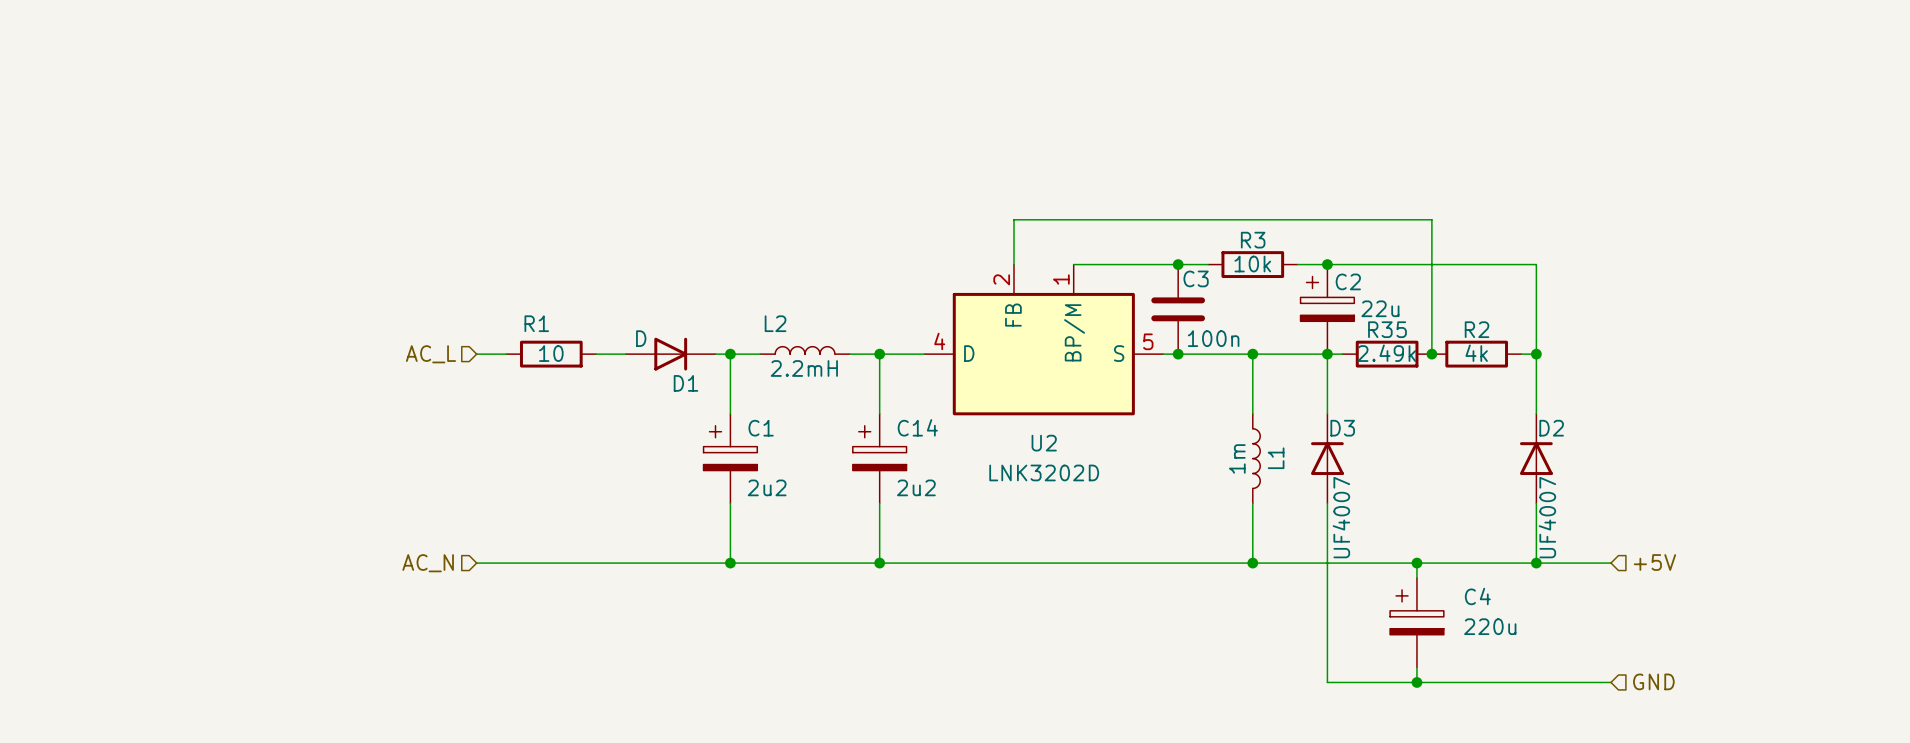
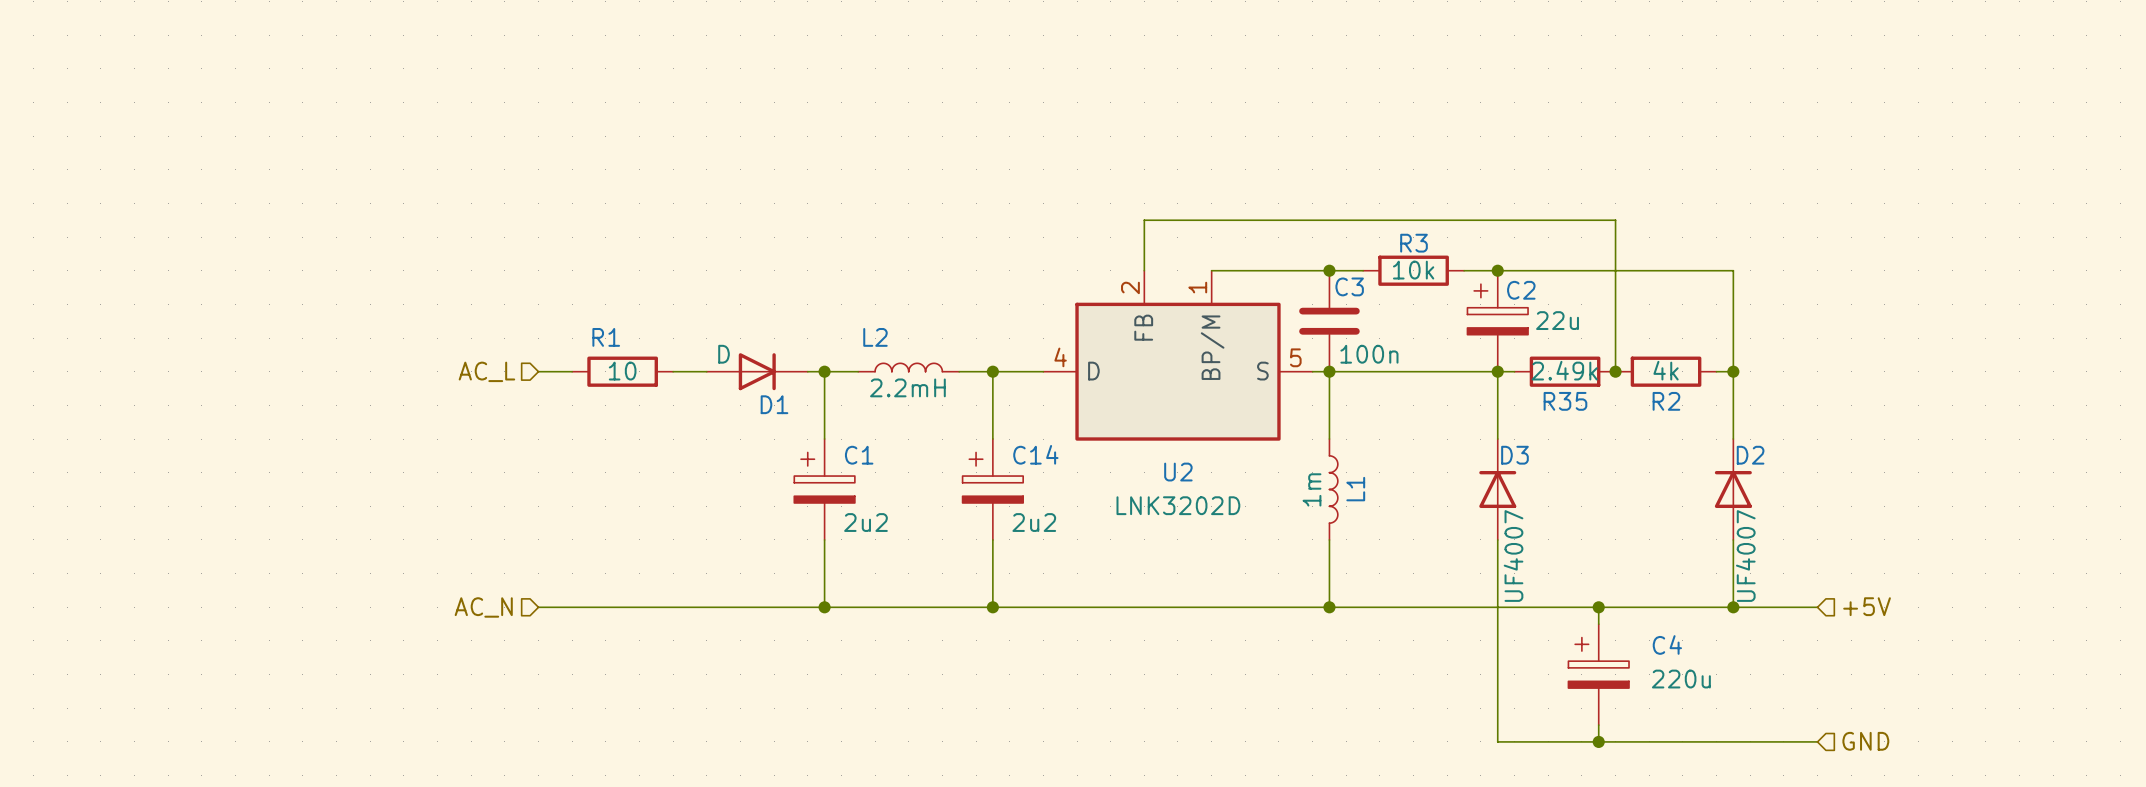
R35 name position: R35 (1387, 329) -> R35 (1565, 401)
R2 name position: R2 (1477, 329) -> R2 (1666, 401)
wire: (1252, 354) (1252, 413) -> (1329, 371) (1329, 439)
junction: (1252, 354) -> none
L1 position: (1256, 458) -> (1333, 489)
wire: (1252, 503) (1252, 563) -> (1329, 539) (1329, 607)
junction: none -> (1329, 607)
junction: (1252, 563) -> none

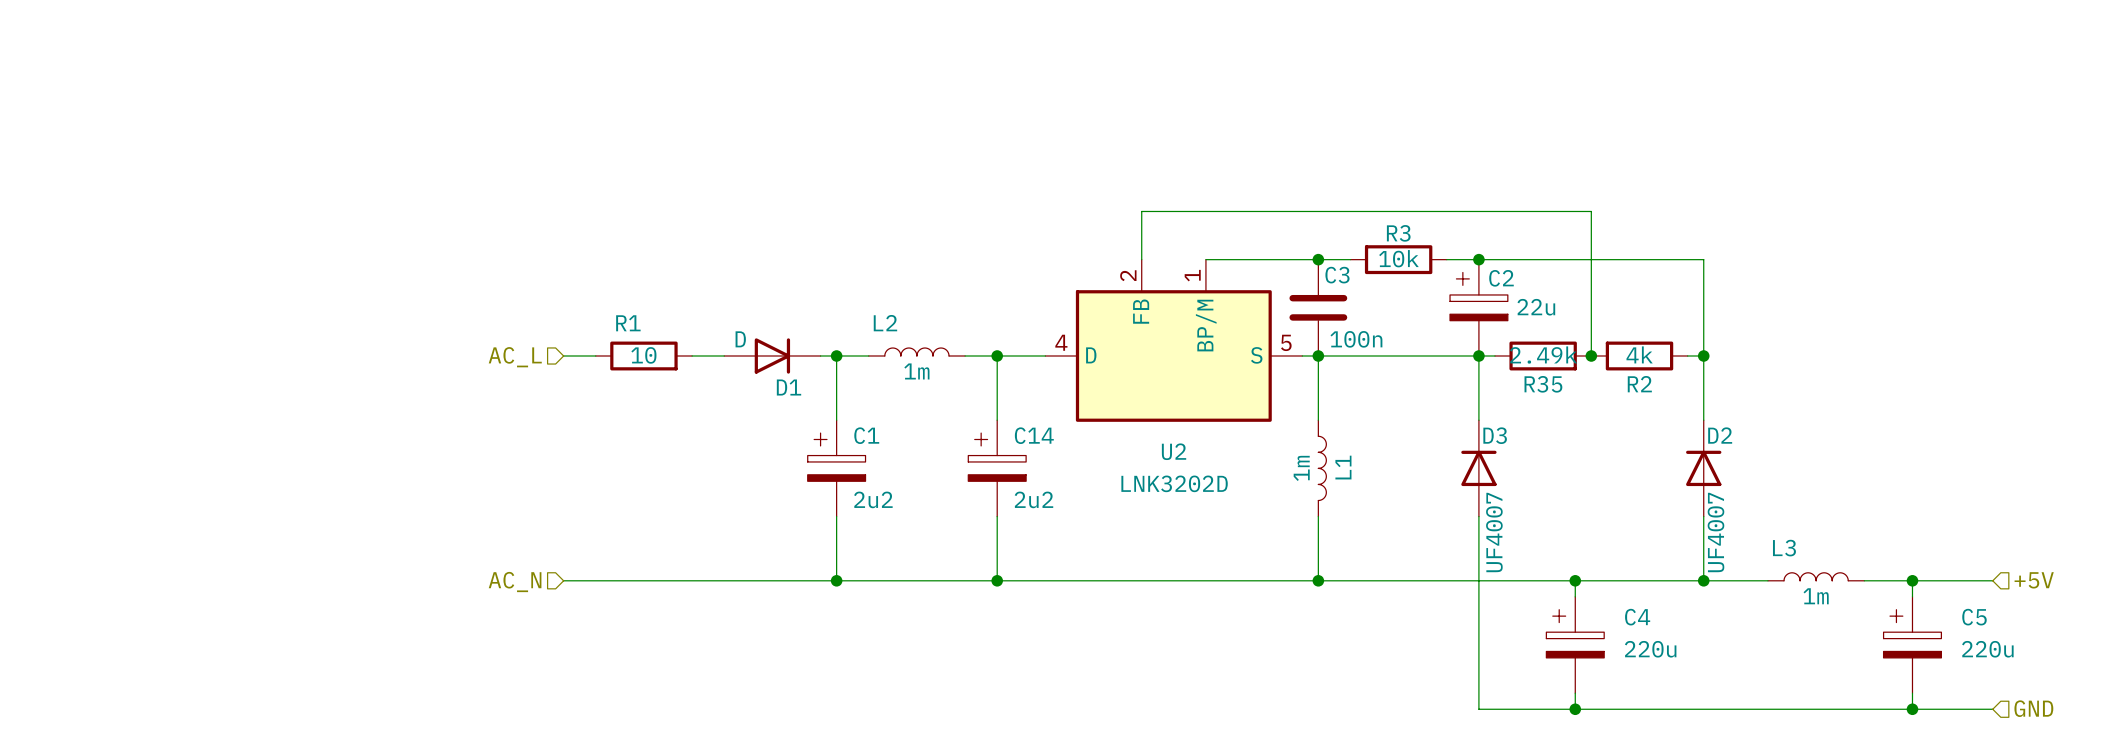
L2 value: 2.2mH (907, 387) -> 1m (916, 371)
L3: none -> 1m (1816, 576)
hierarchical label position: +5V (1867, 606) -> +5V (2034, 580)
wire: none -> (1864, 580) (1992, 580)
wire: none -> (1912, 580) (1912, 596)
junction: none -> (1912, 580)
C5: none -> 220u (1912, 645)
wire: none -> (1912, 693) (1912, 709)
wire: none -> (1784, 709) (1992, 709)
hierarchical label position: GND (1865, 741) -> GND (2033, 708)
junction: none -> (1912, 709)

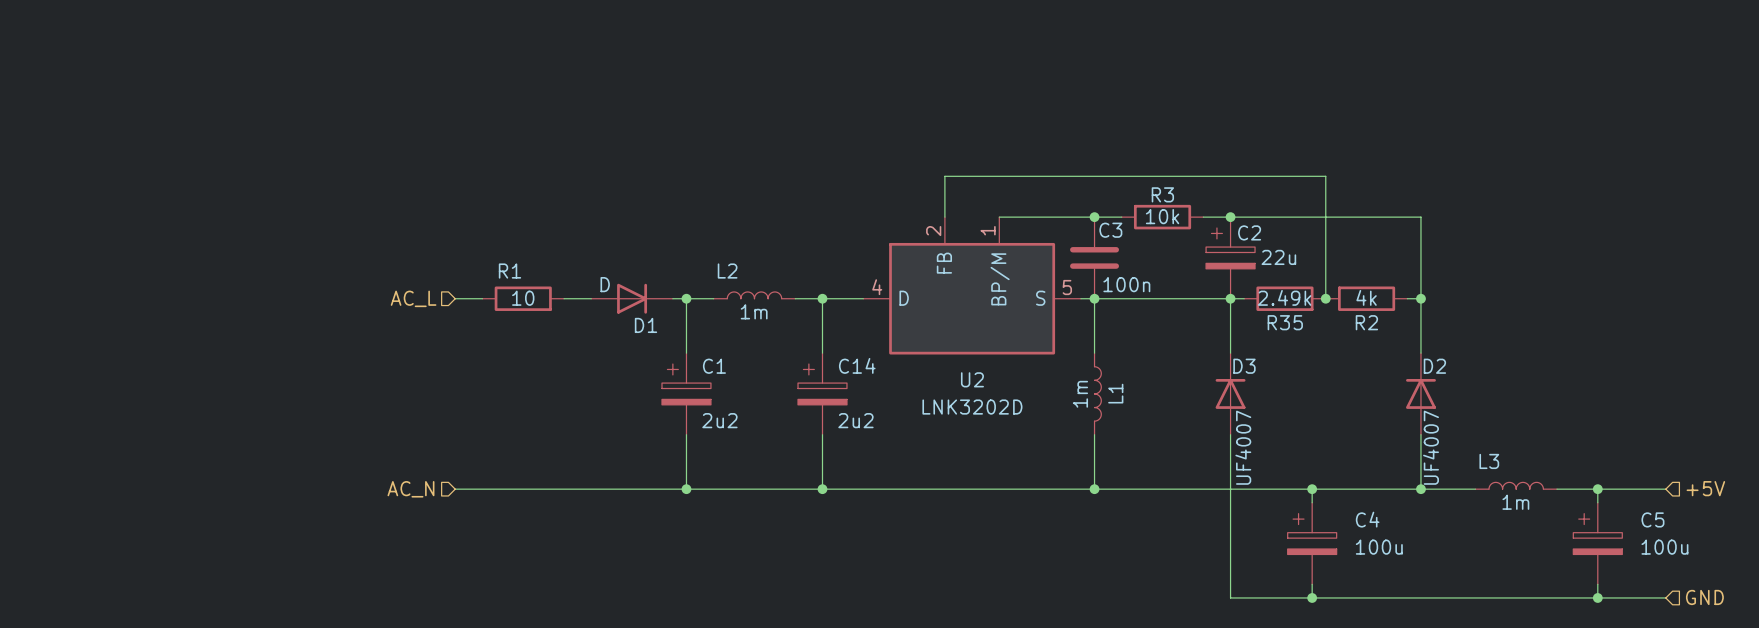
C4 value: 220u (1650, 649) -> 100u (1379, 547)
C5 value: 220u (1987, 649) -> 100u (1664, 547)

